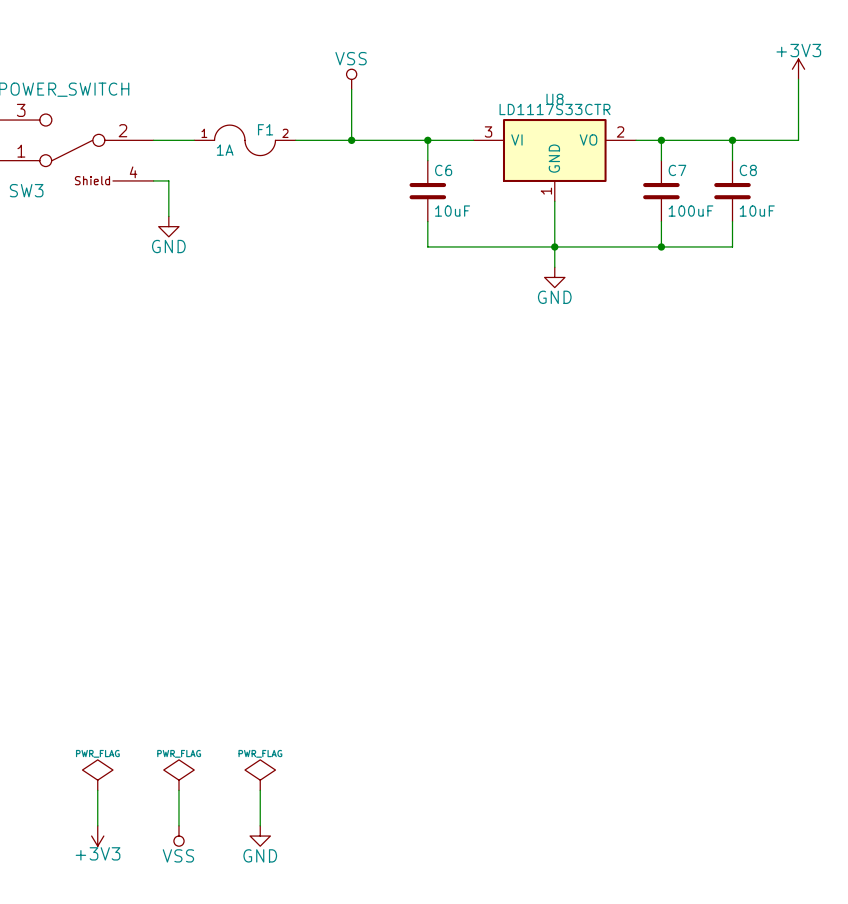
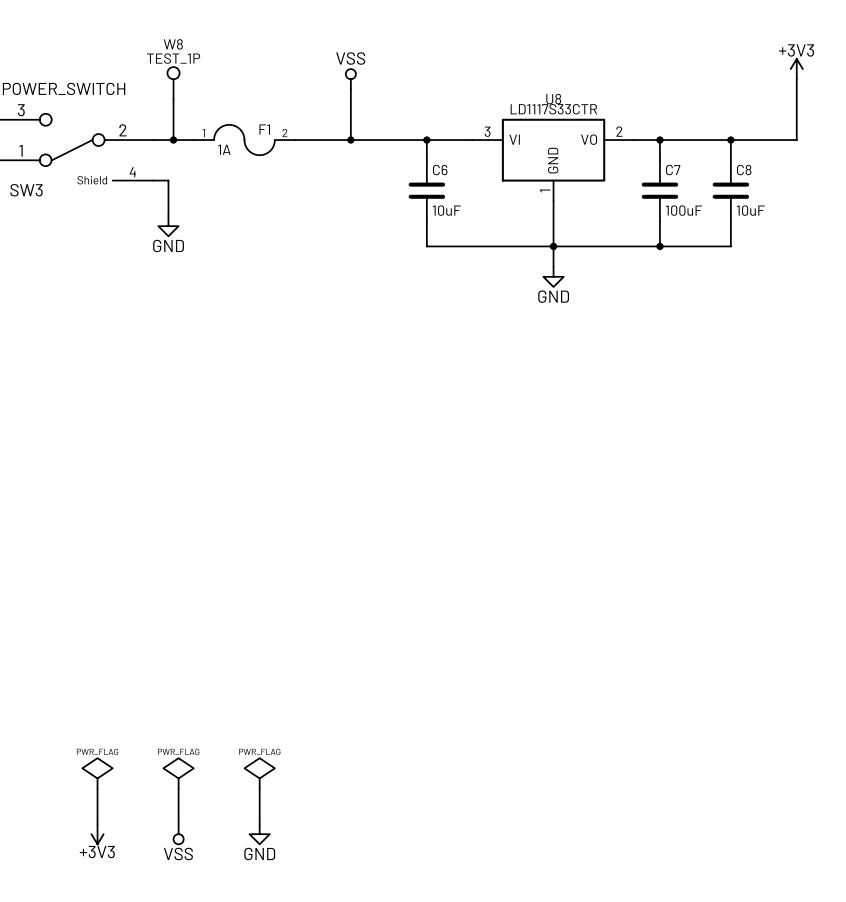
W8: none -> TEST_1P (173, 83)
wire: none -> (173, 99) (173, 140)
junction: none -> (173, 140)

